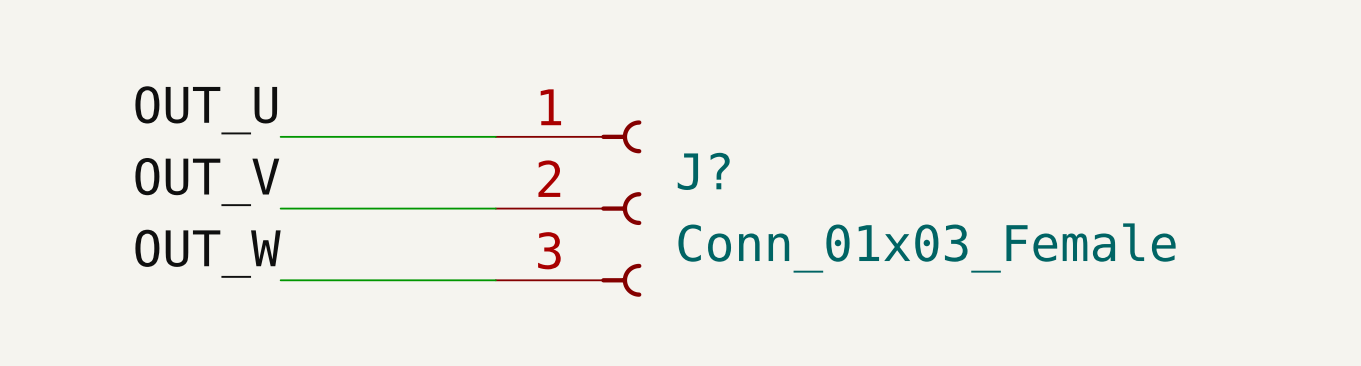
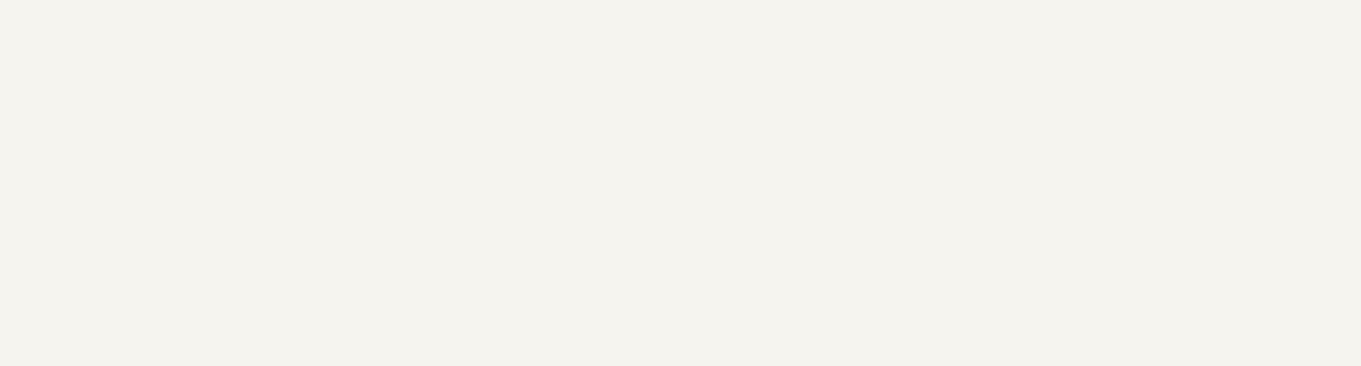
label: OUT_U (206, 110) -> none
wire: (280, 136) (495, 136) -> none
label: OUT_V (207, 182) -> none
wire: (280, 208) (495, 208) -> none
J?: Conn_01x03_Female (568, 208) -> none
label: OUT_W (208, 253) -> none
wire: (280, 280) (495, 280) -> none

